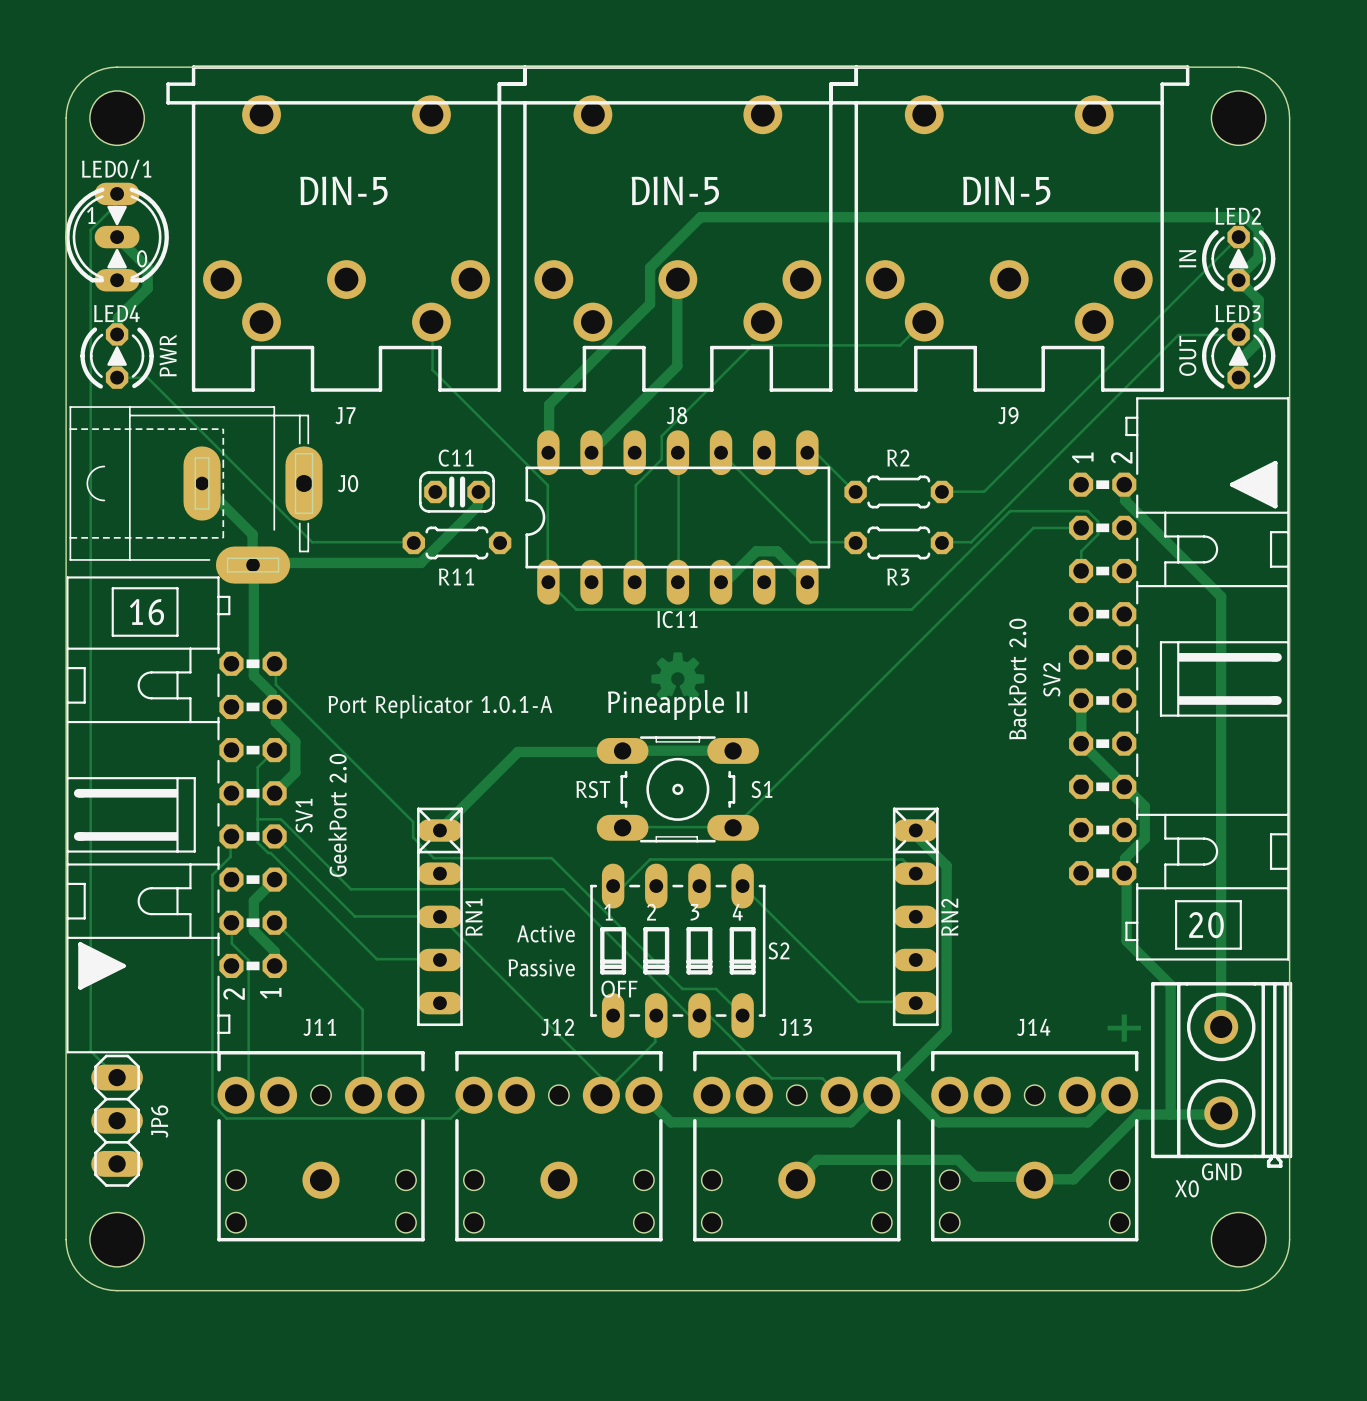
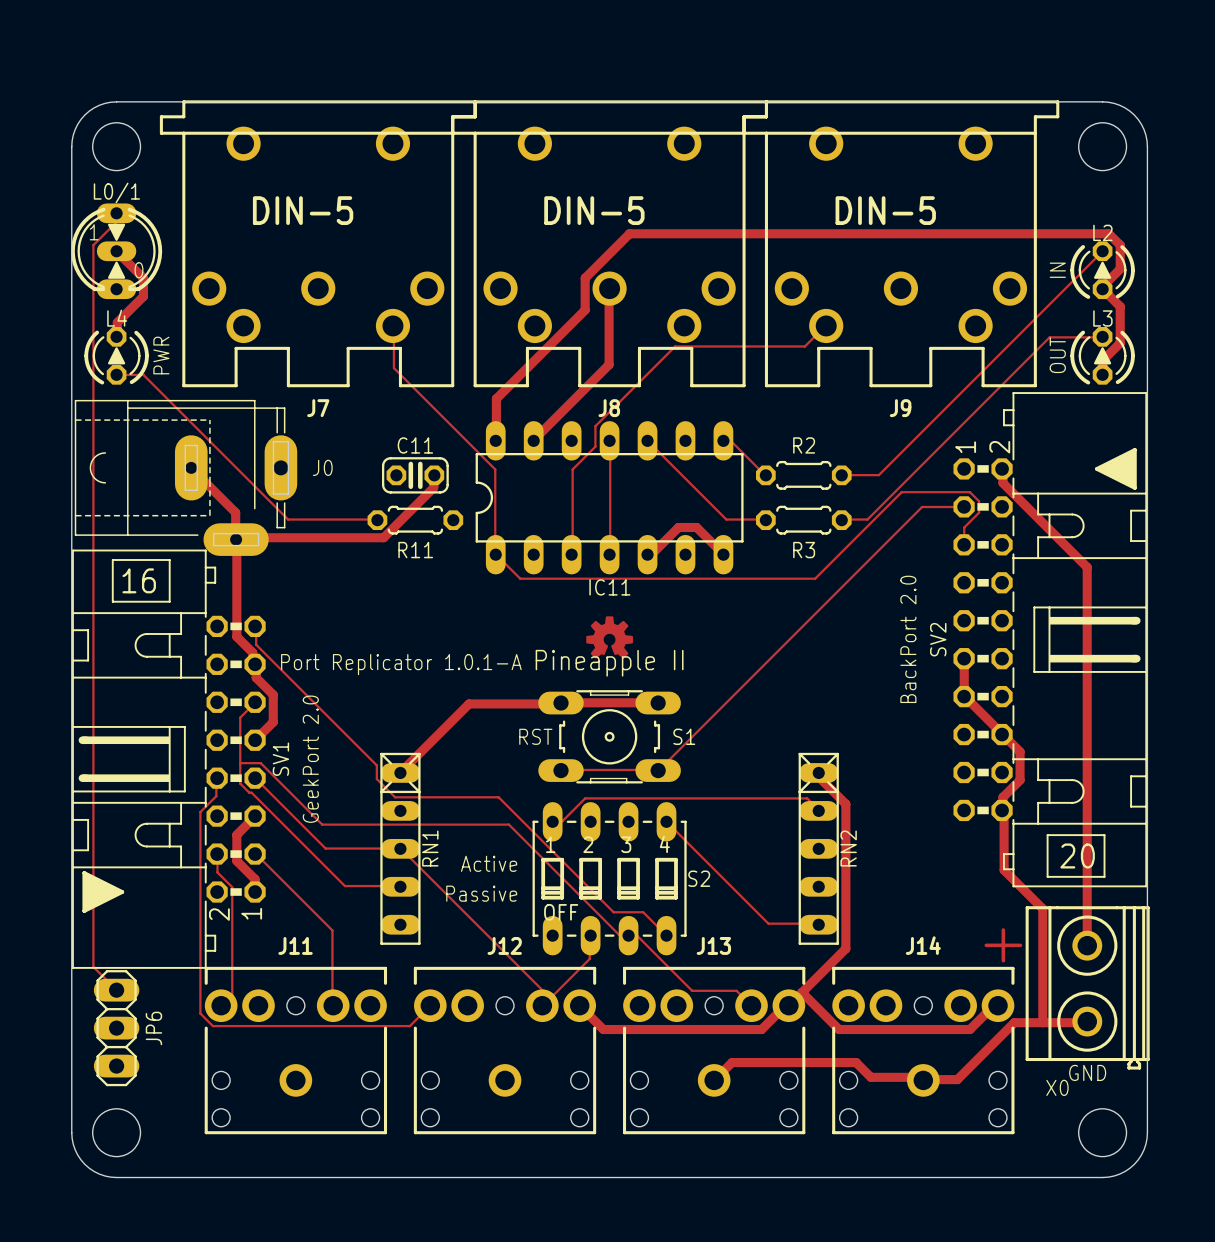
LED0/1 name: LED0/1 (116, 169) -> L0/1 (116, 192)
LED2 name: LED2 (1238, 216) -> L2 (1102, 232)
LED4 name: LED4 (116, 313) -> L4 (117, 318)
LED3 name: LED3 (1238, 313) -> L3 (1102, 318)

